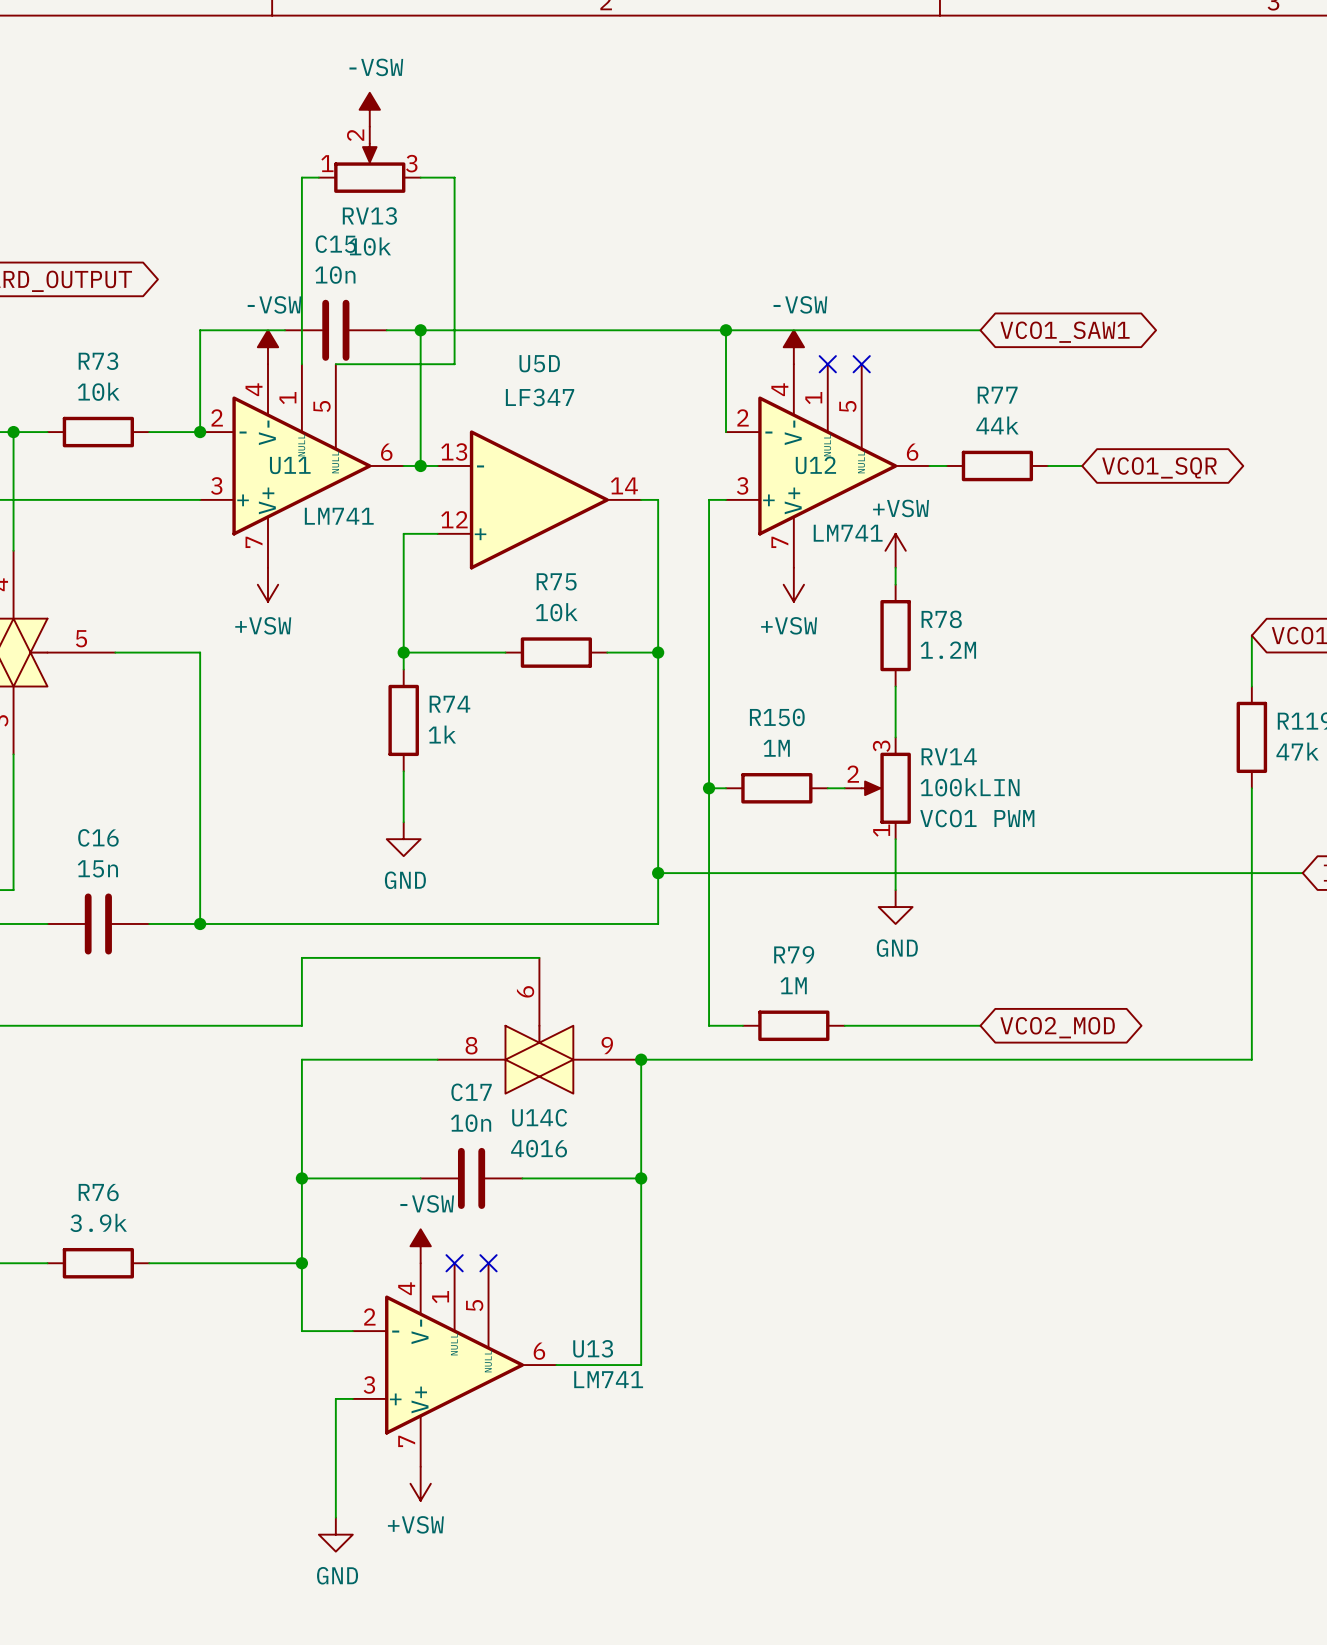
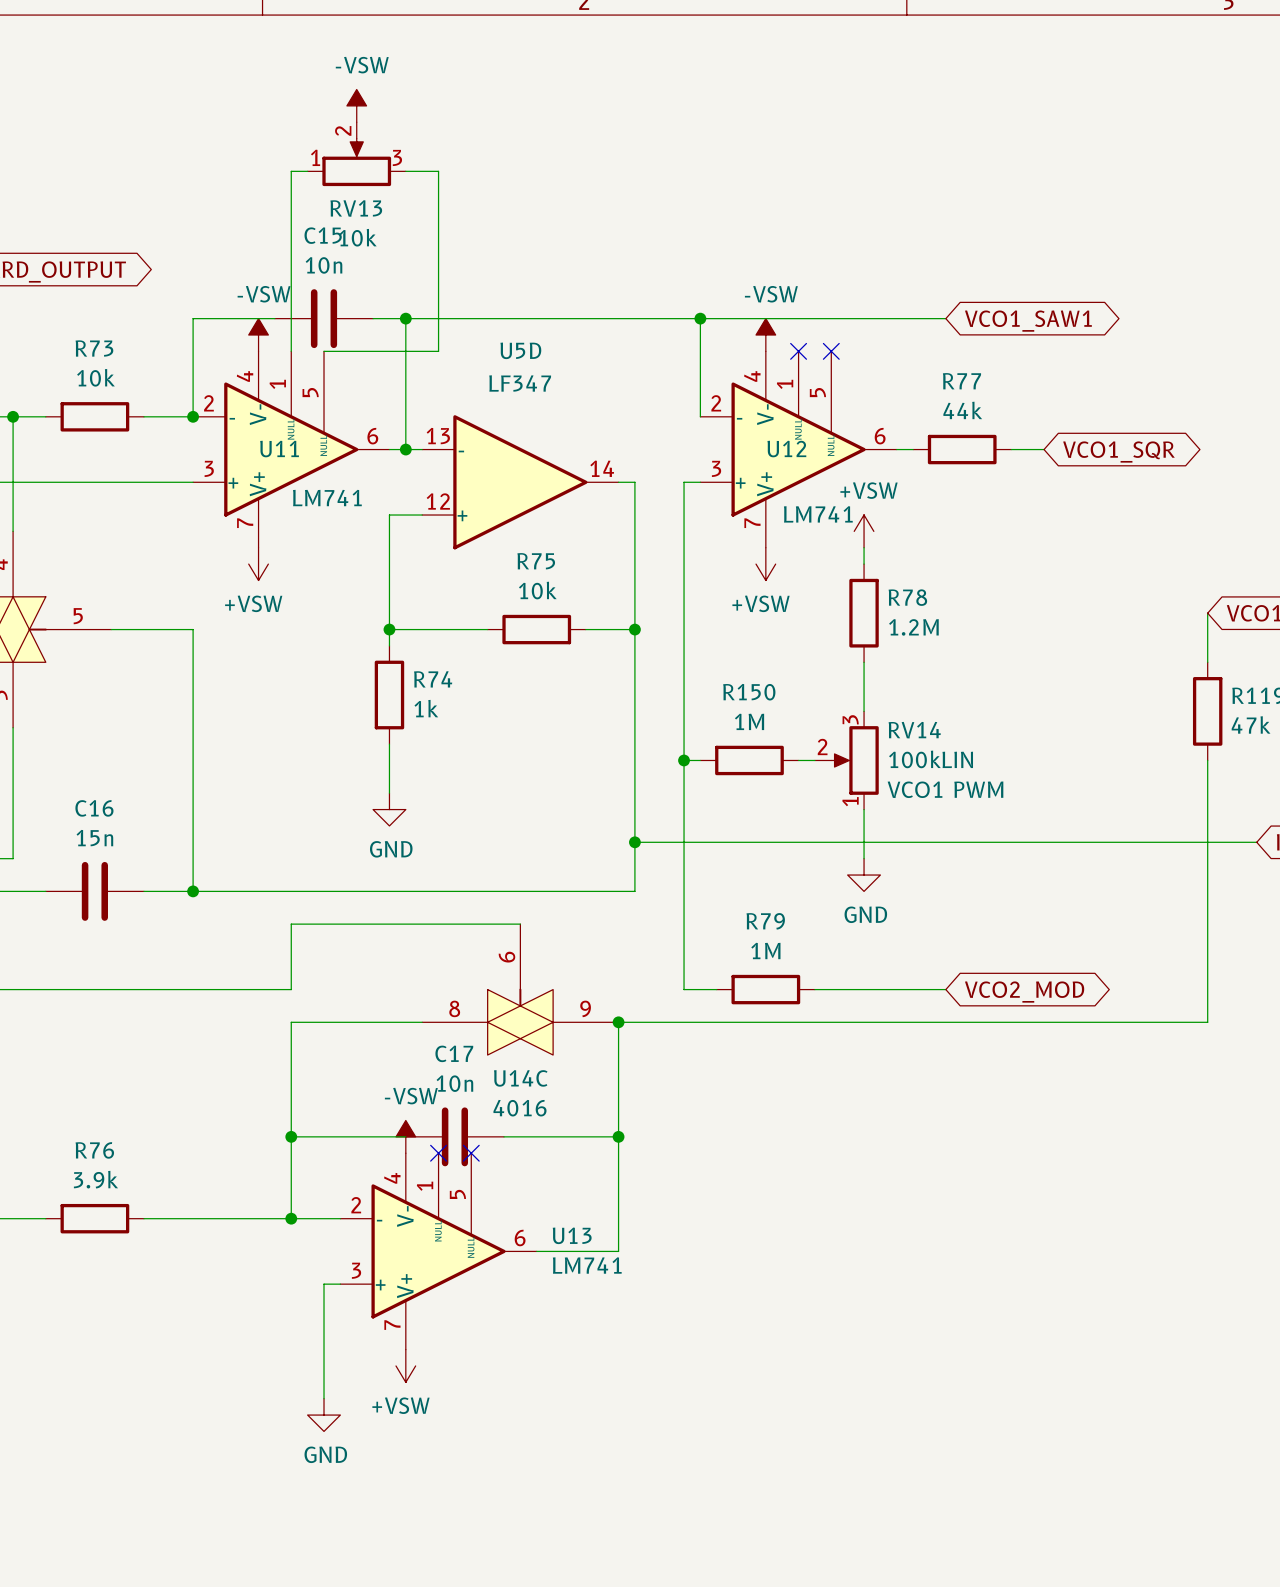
no-connect mark: none -> (438, 1153)
no-connect mark: none -> (471, 1153)
power symbol position: -VSW (420, 1246) -> -VSW (405, 1136)
wire: (301, 1263) (301, 1331) (335, 1331) -> (291, 1218) (340, 1218)
no-connect mark: (454, 1263) -> none
no-connect mark: (488, 1263) -> none
wire: (641, 1297) (641, 1365) (556, 1365) -> (618, 1251) (536, 1251)
U13 position: (454, 1365) -> (438, 1251)
wire: (335, 1398) (352, 1398) -> (324, 1349) (324, 1284)
wire: (335, 1449) (335, 1517) -> none
power symbol position: +VSW (420, 1483) -> +VSW (405, 1365)
power symbol position: GND (335, 1534) -> GND (324, 1415)

